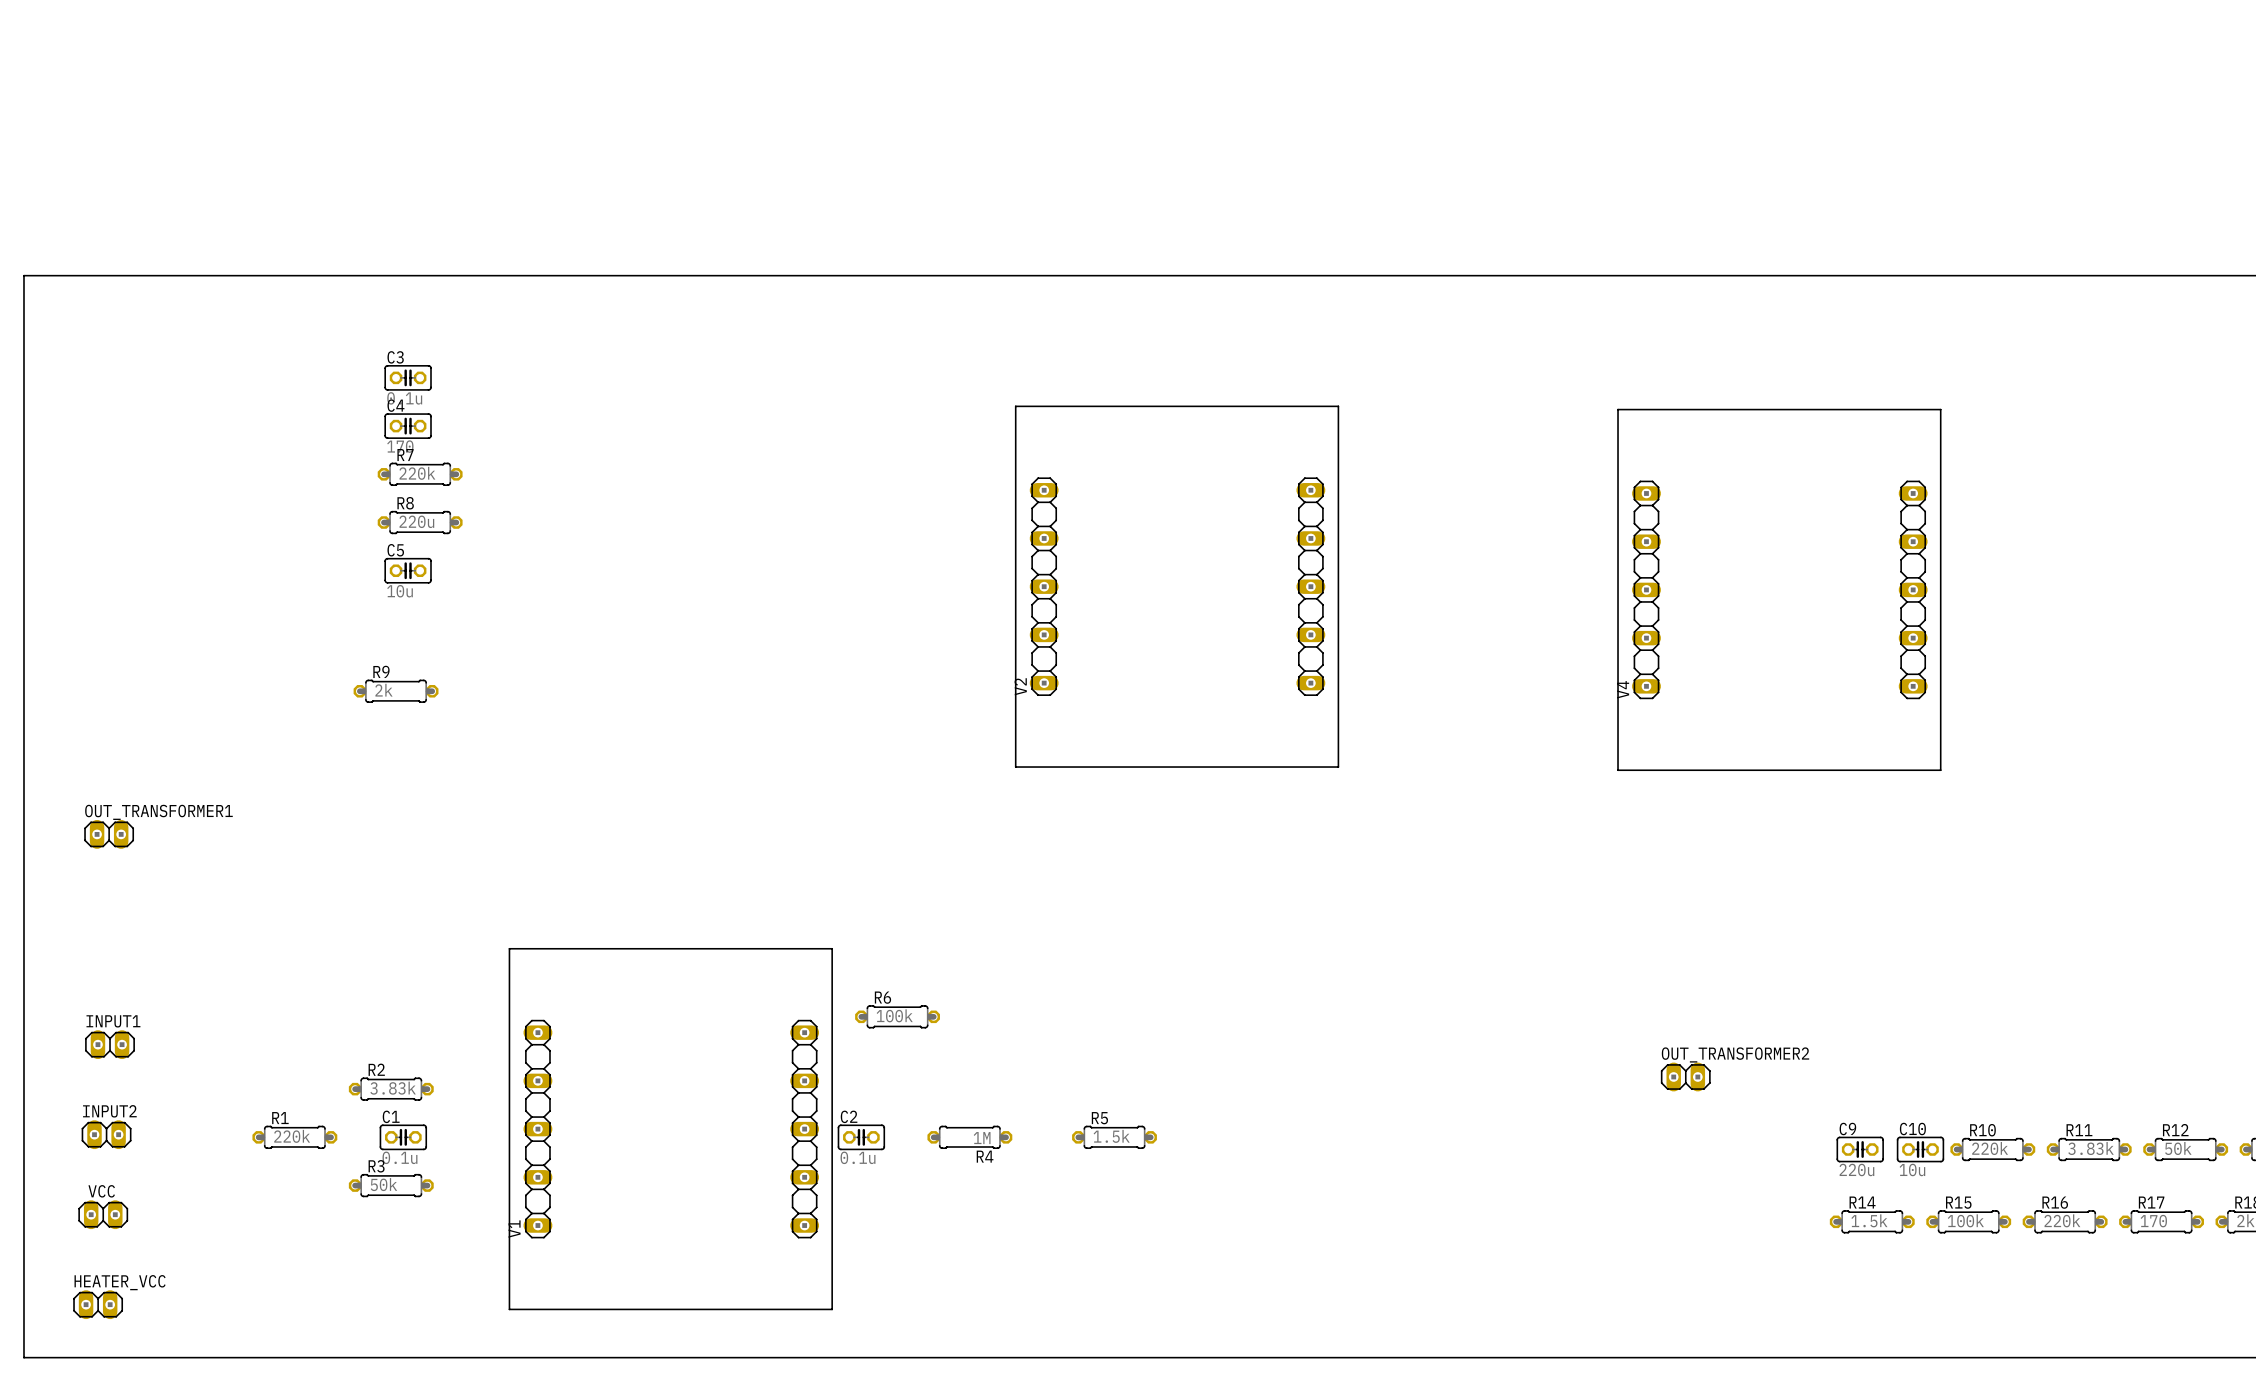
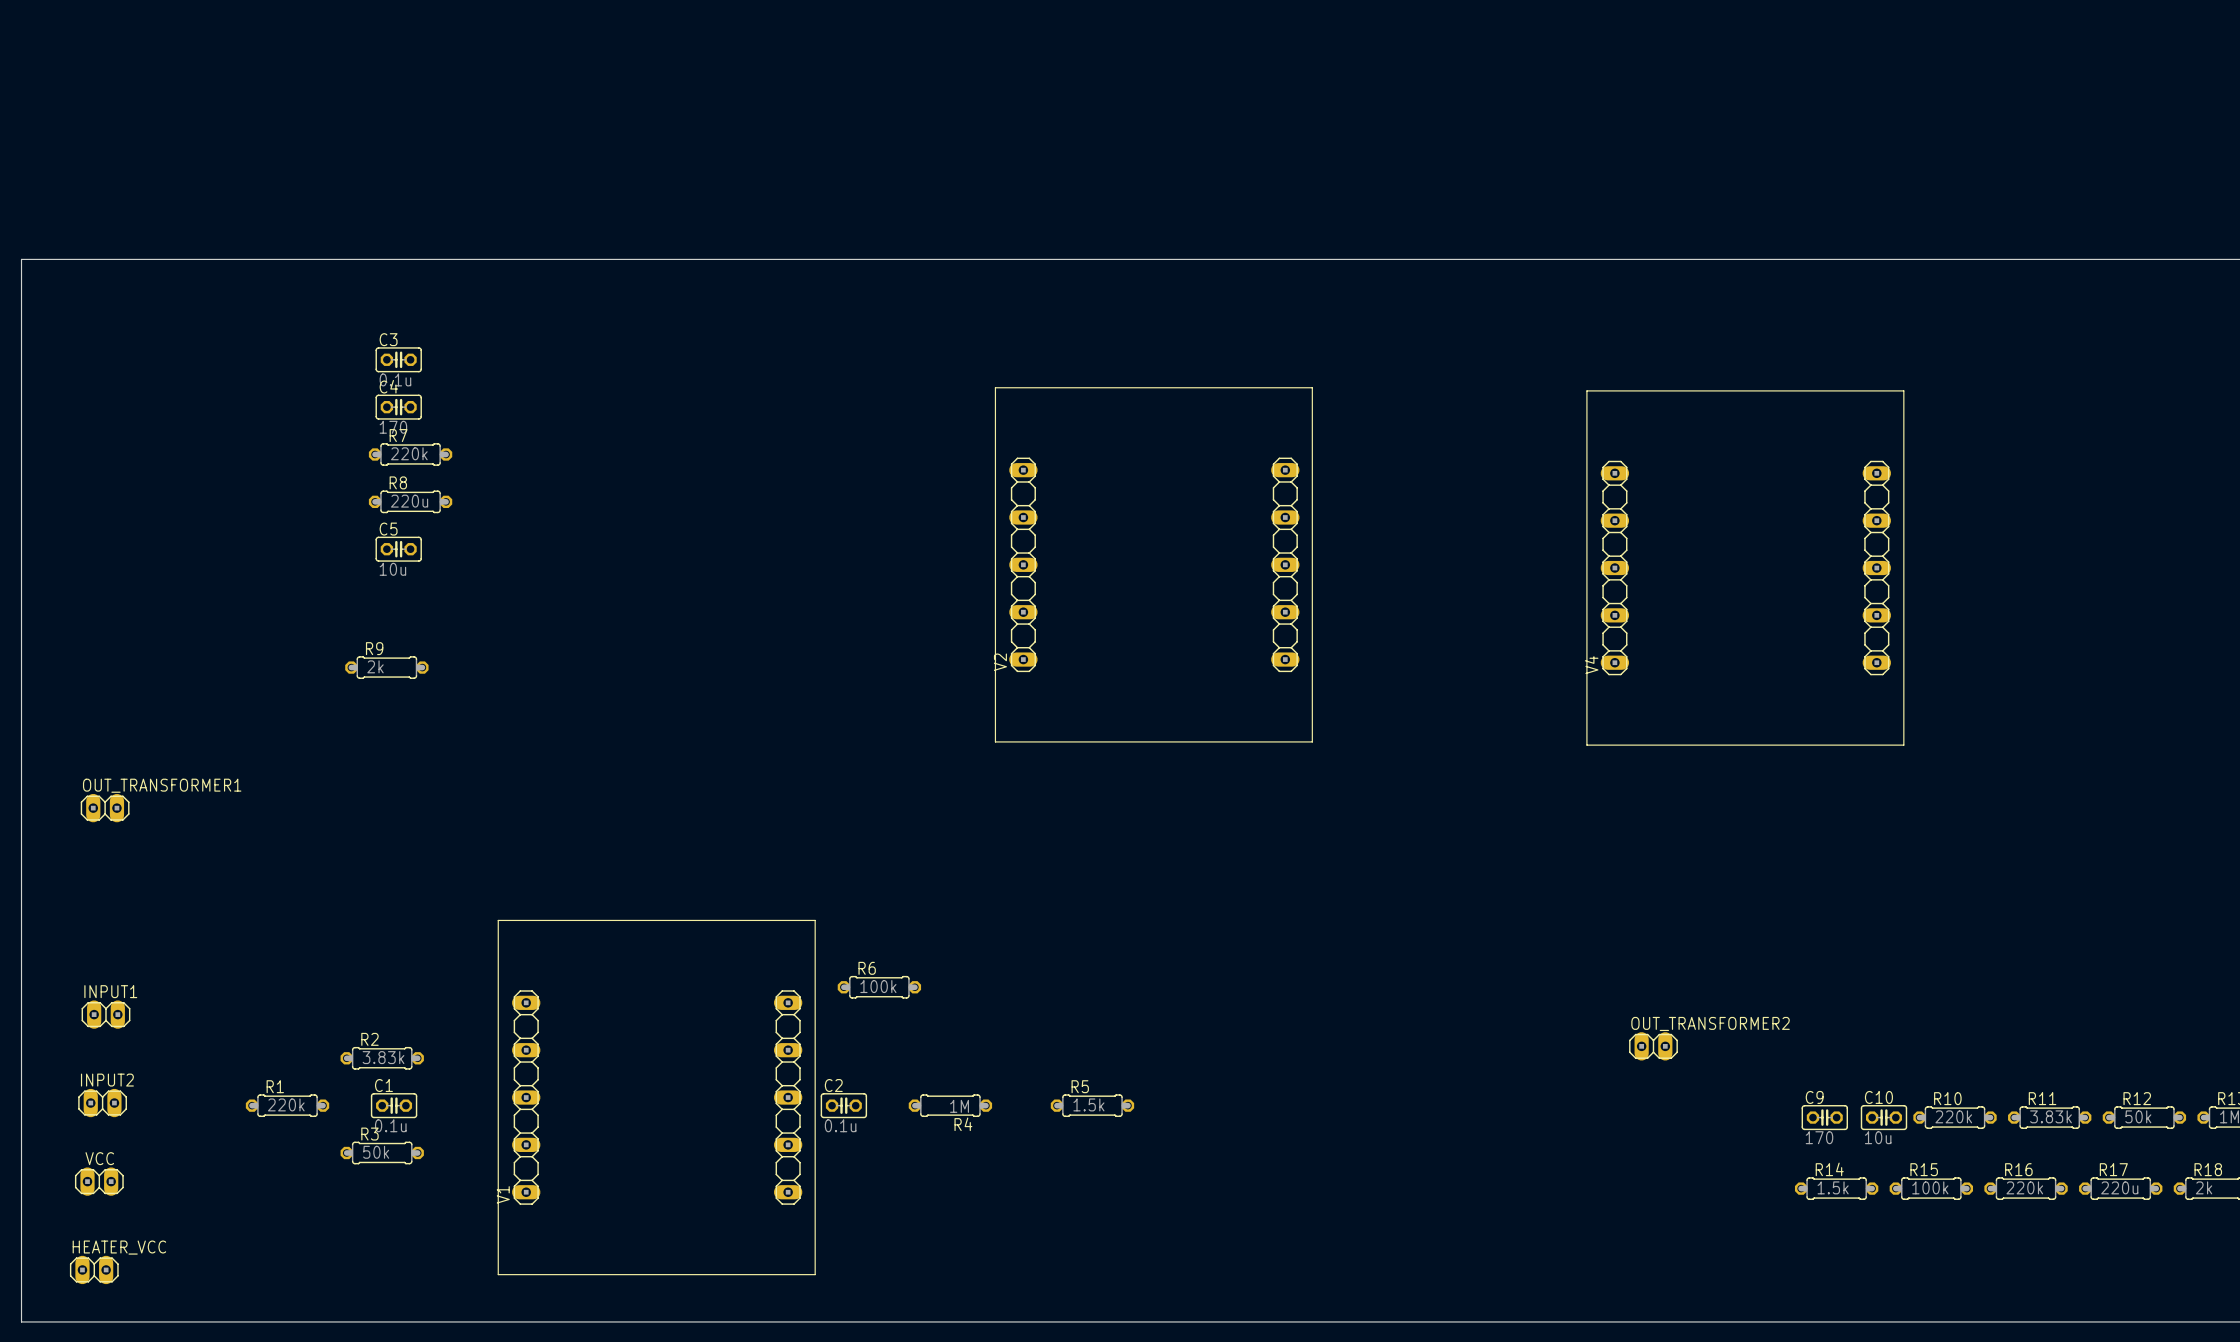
C9 value: 220u (1856, 1169) -> 170 (1819, 1137)
R17 value: 170 (2153, 1221) -> 220u (2119, 1187)

